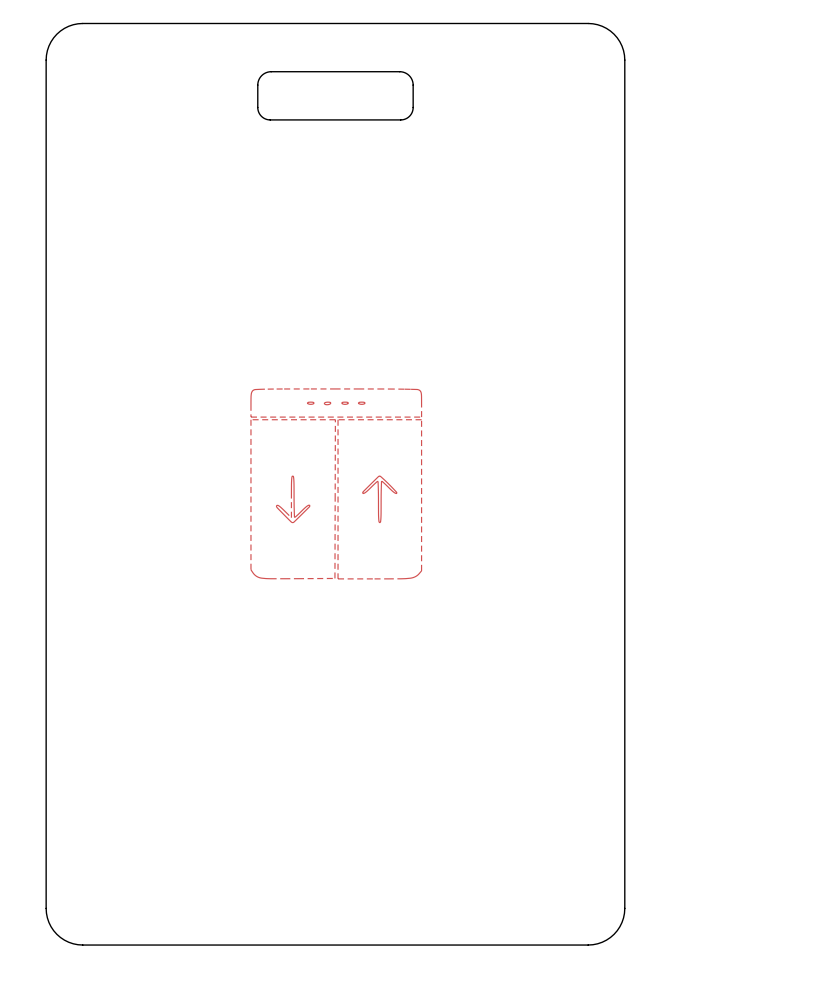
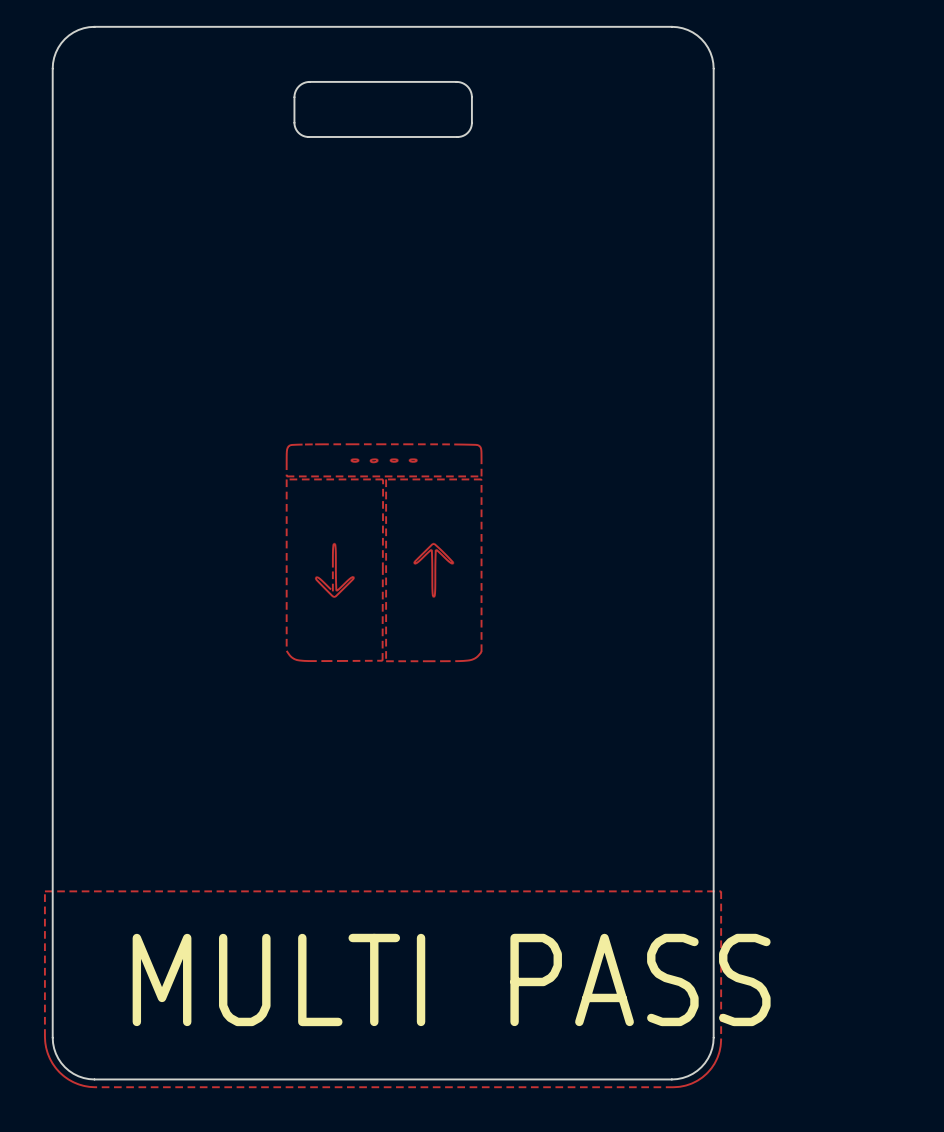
top zone outline: none -> (44, 891) (721, 891) (719, 1051) (711, 1068) (702, 1077) (685, 1085) (673, 1087) (84, 1085) (73, 1082) (59, 1072) (52, 1063) (46, 1048) (44, 891)
text: none -> MULTI PASS (451, 979)

